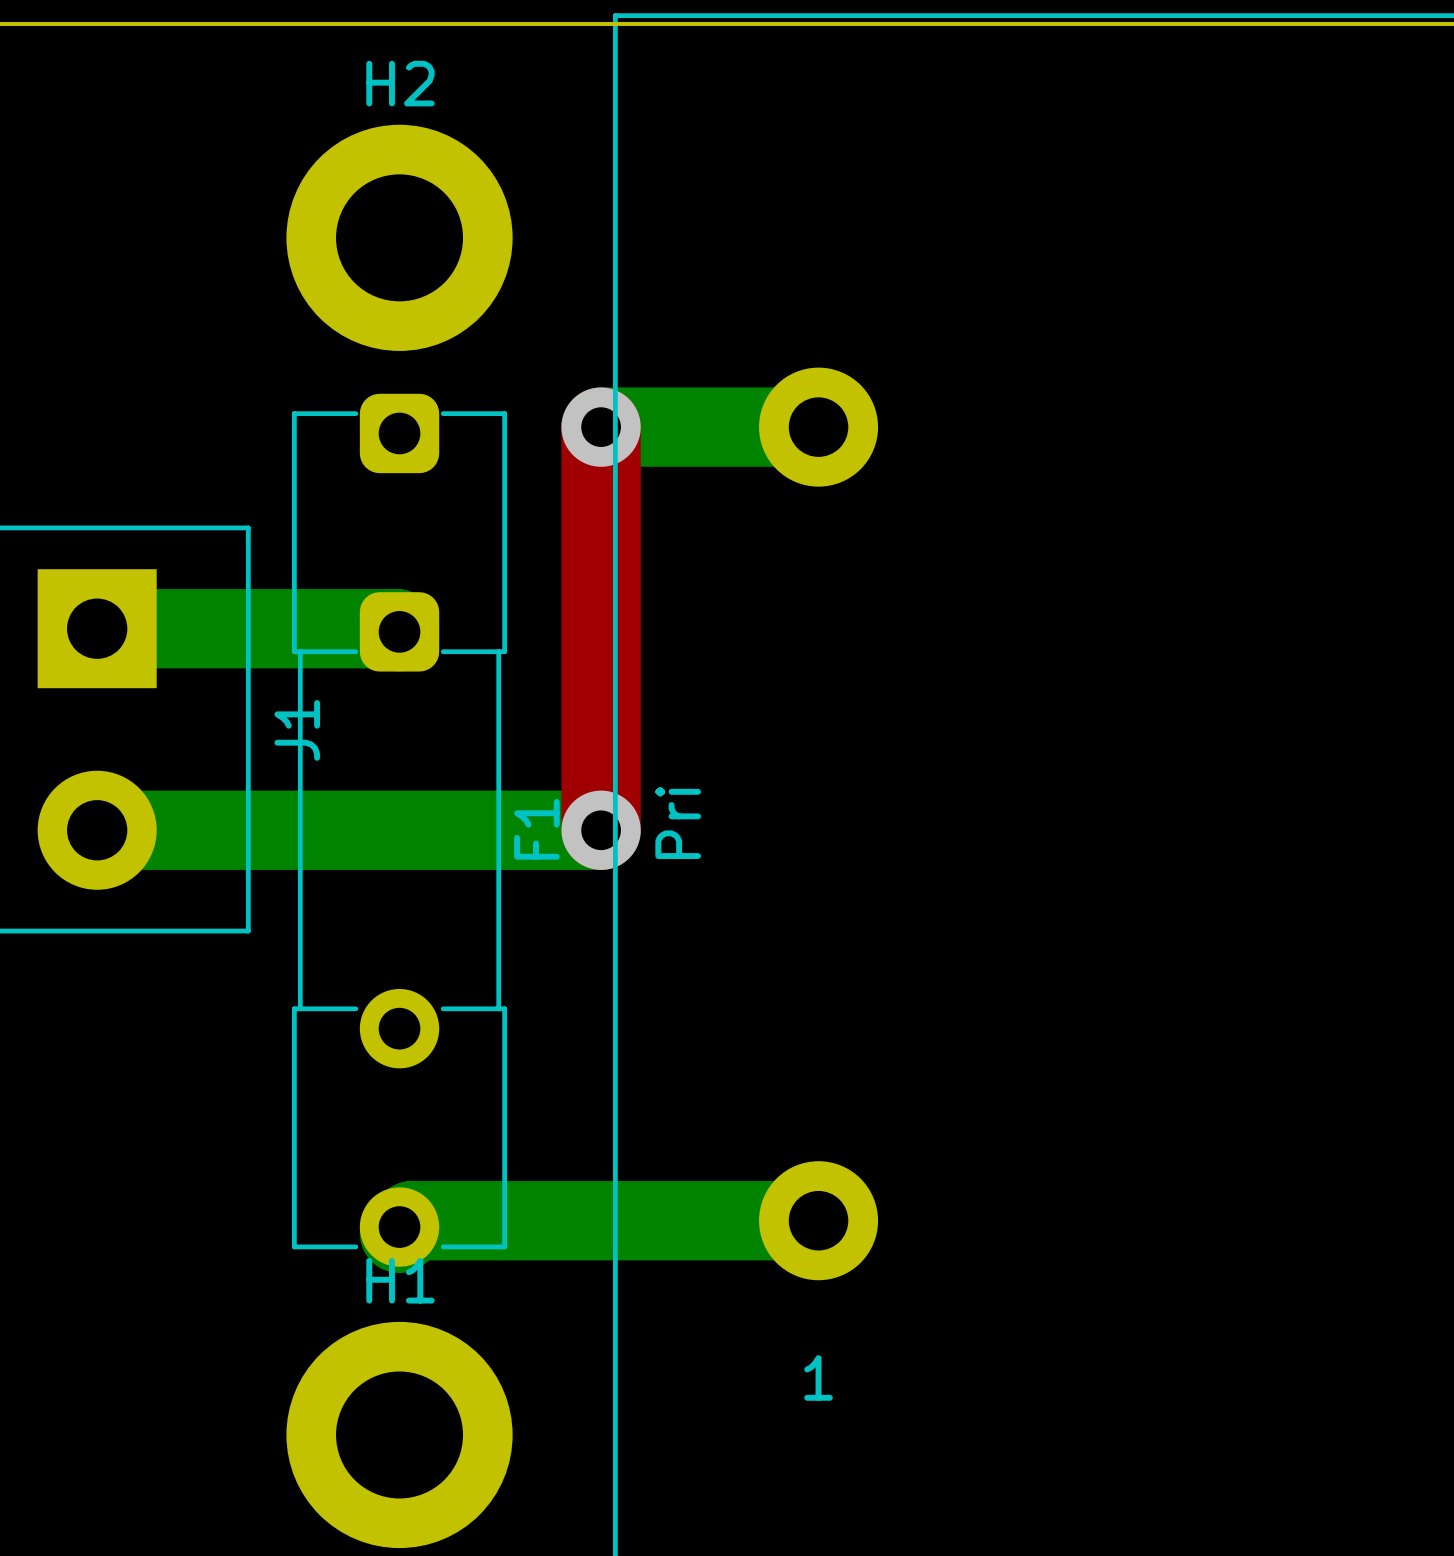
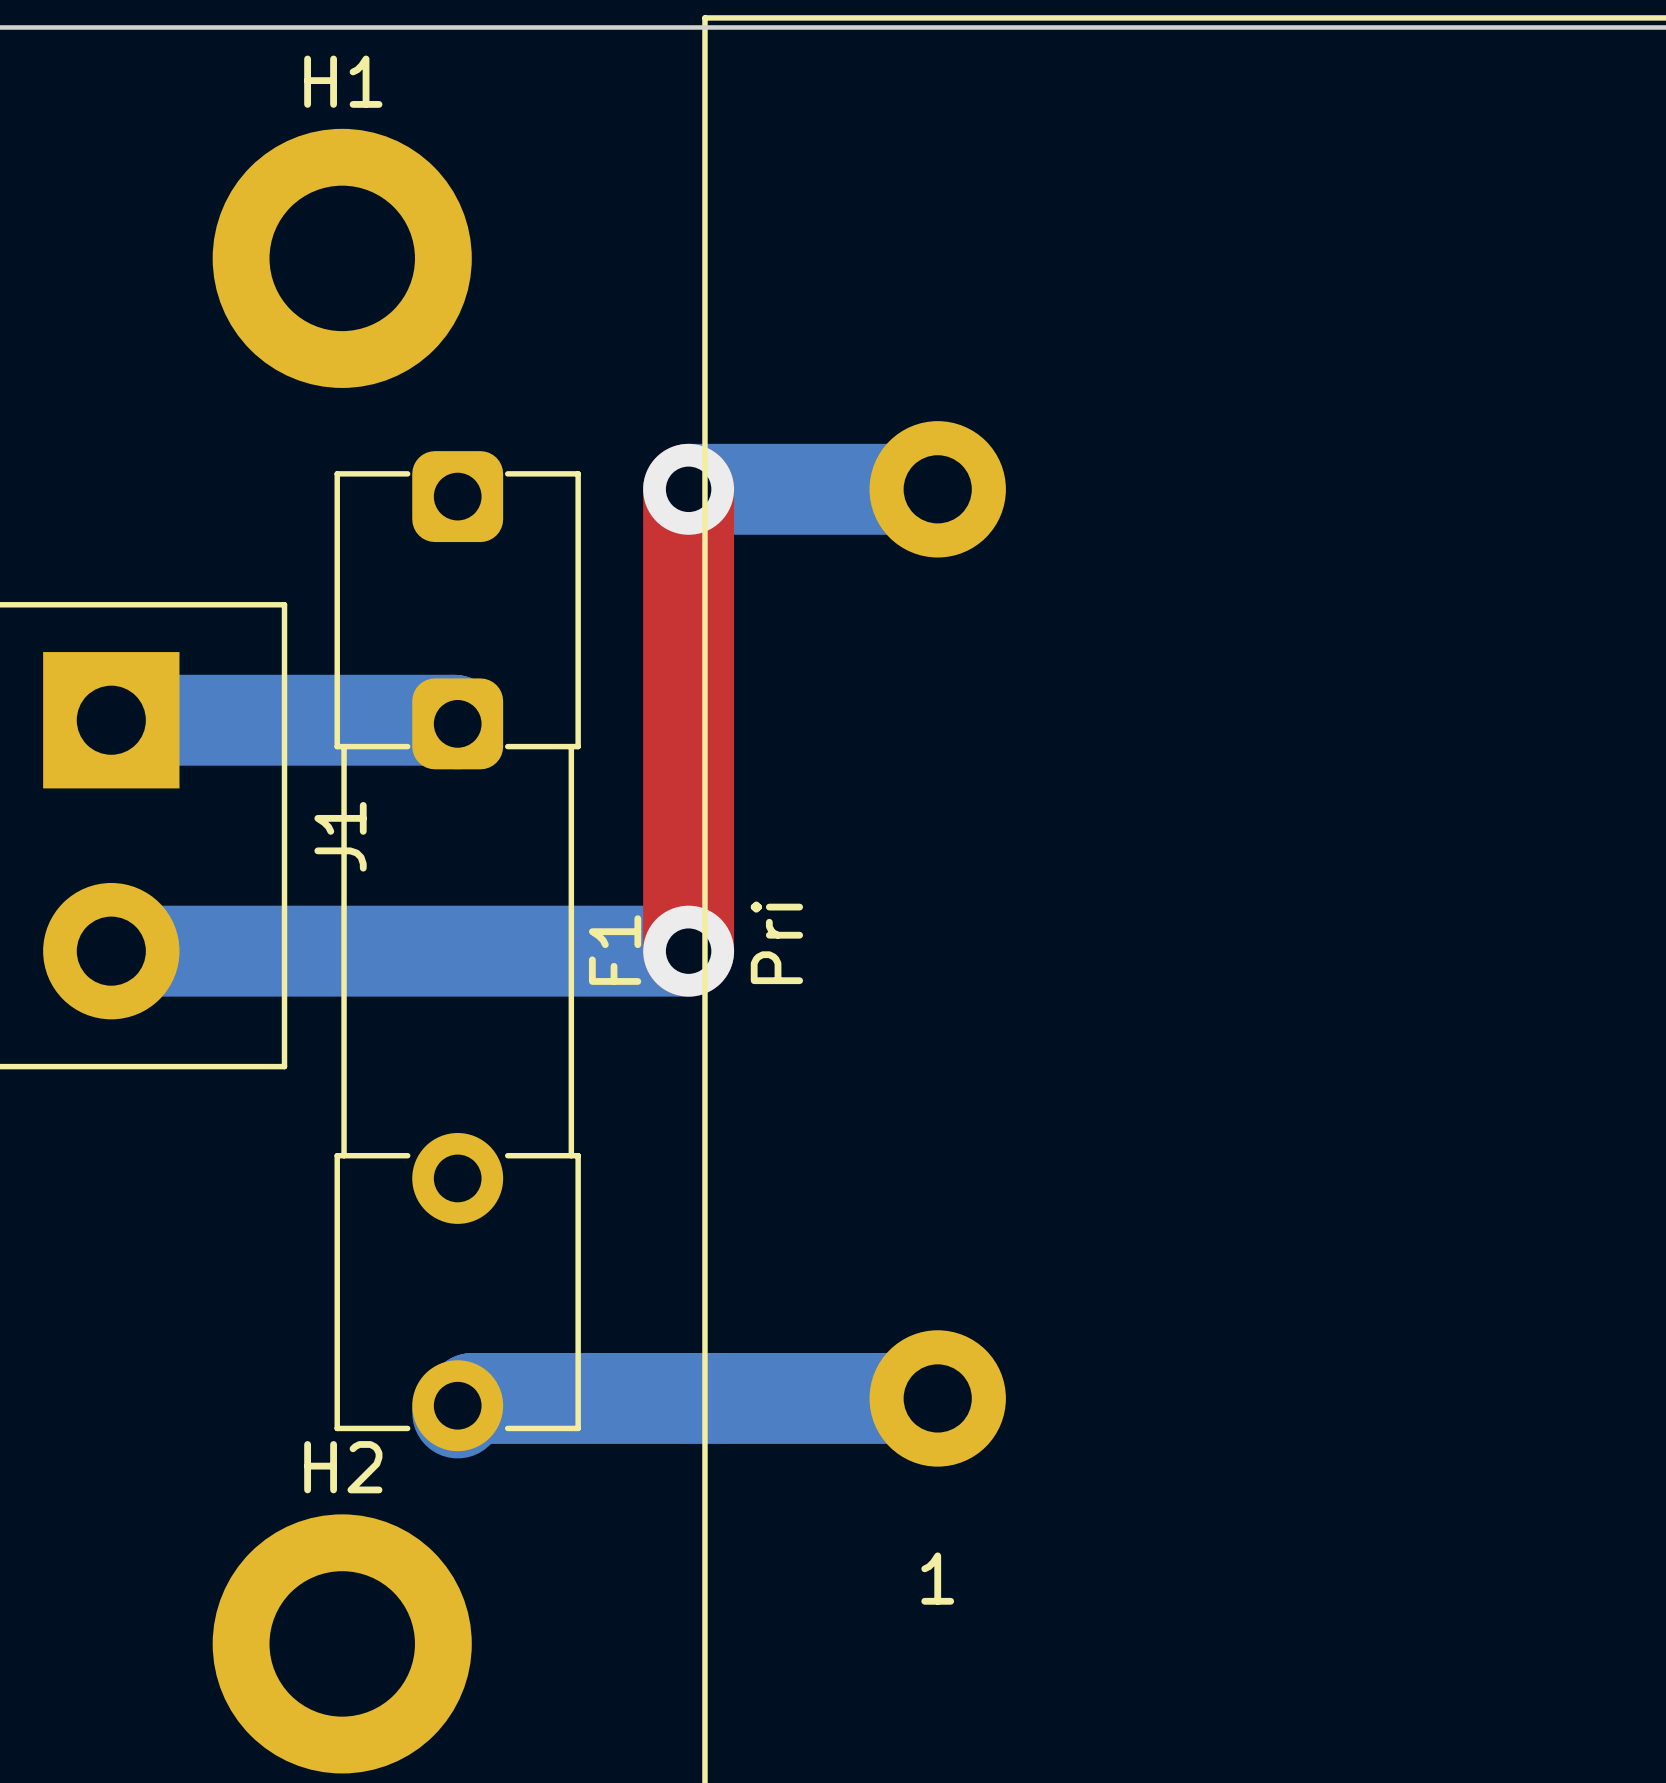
H2 position: (399, 237) -> (342, 1643)
H1 position: (399, 1434) -> (342, 258)

